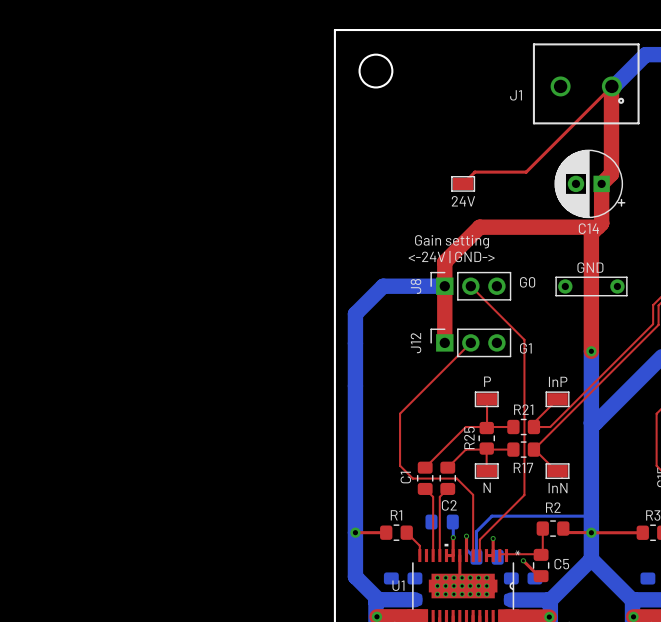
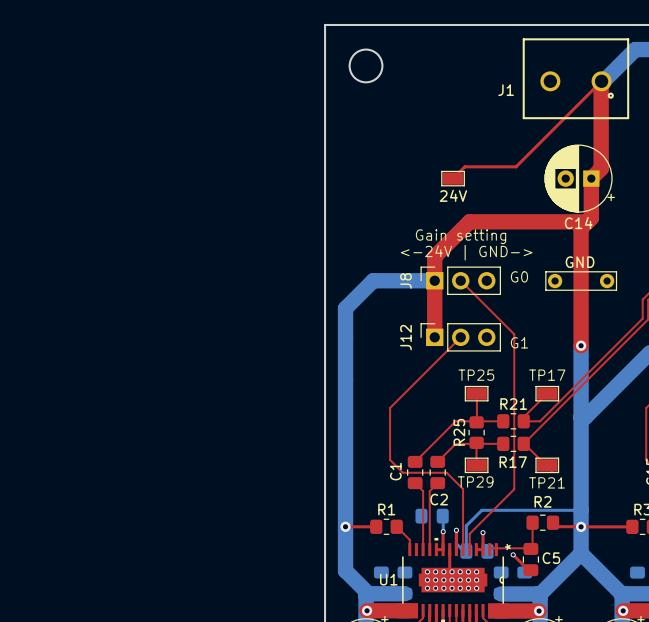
TP25 name: none -> TP25 (476, 375)
TP17 name: none -> TP17 (547, 375)
TP25 value: P (487, 381) -> none
TP17 value: InP (558, 381) -> none
TP29 name: none -> TP29 (475, 481)
TP29 value: N (487, 487) -> none
TP21 name: none -> TP21 (547, 482)
TP21 value: InN (558, 488) -> none

